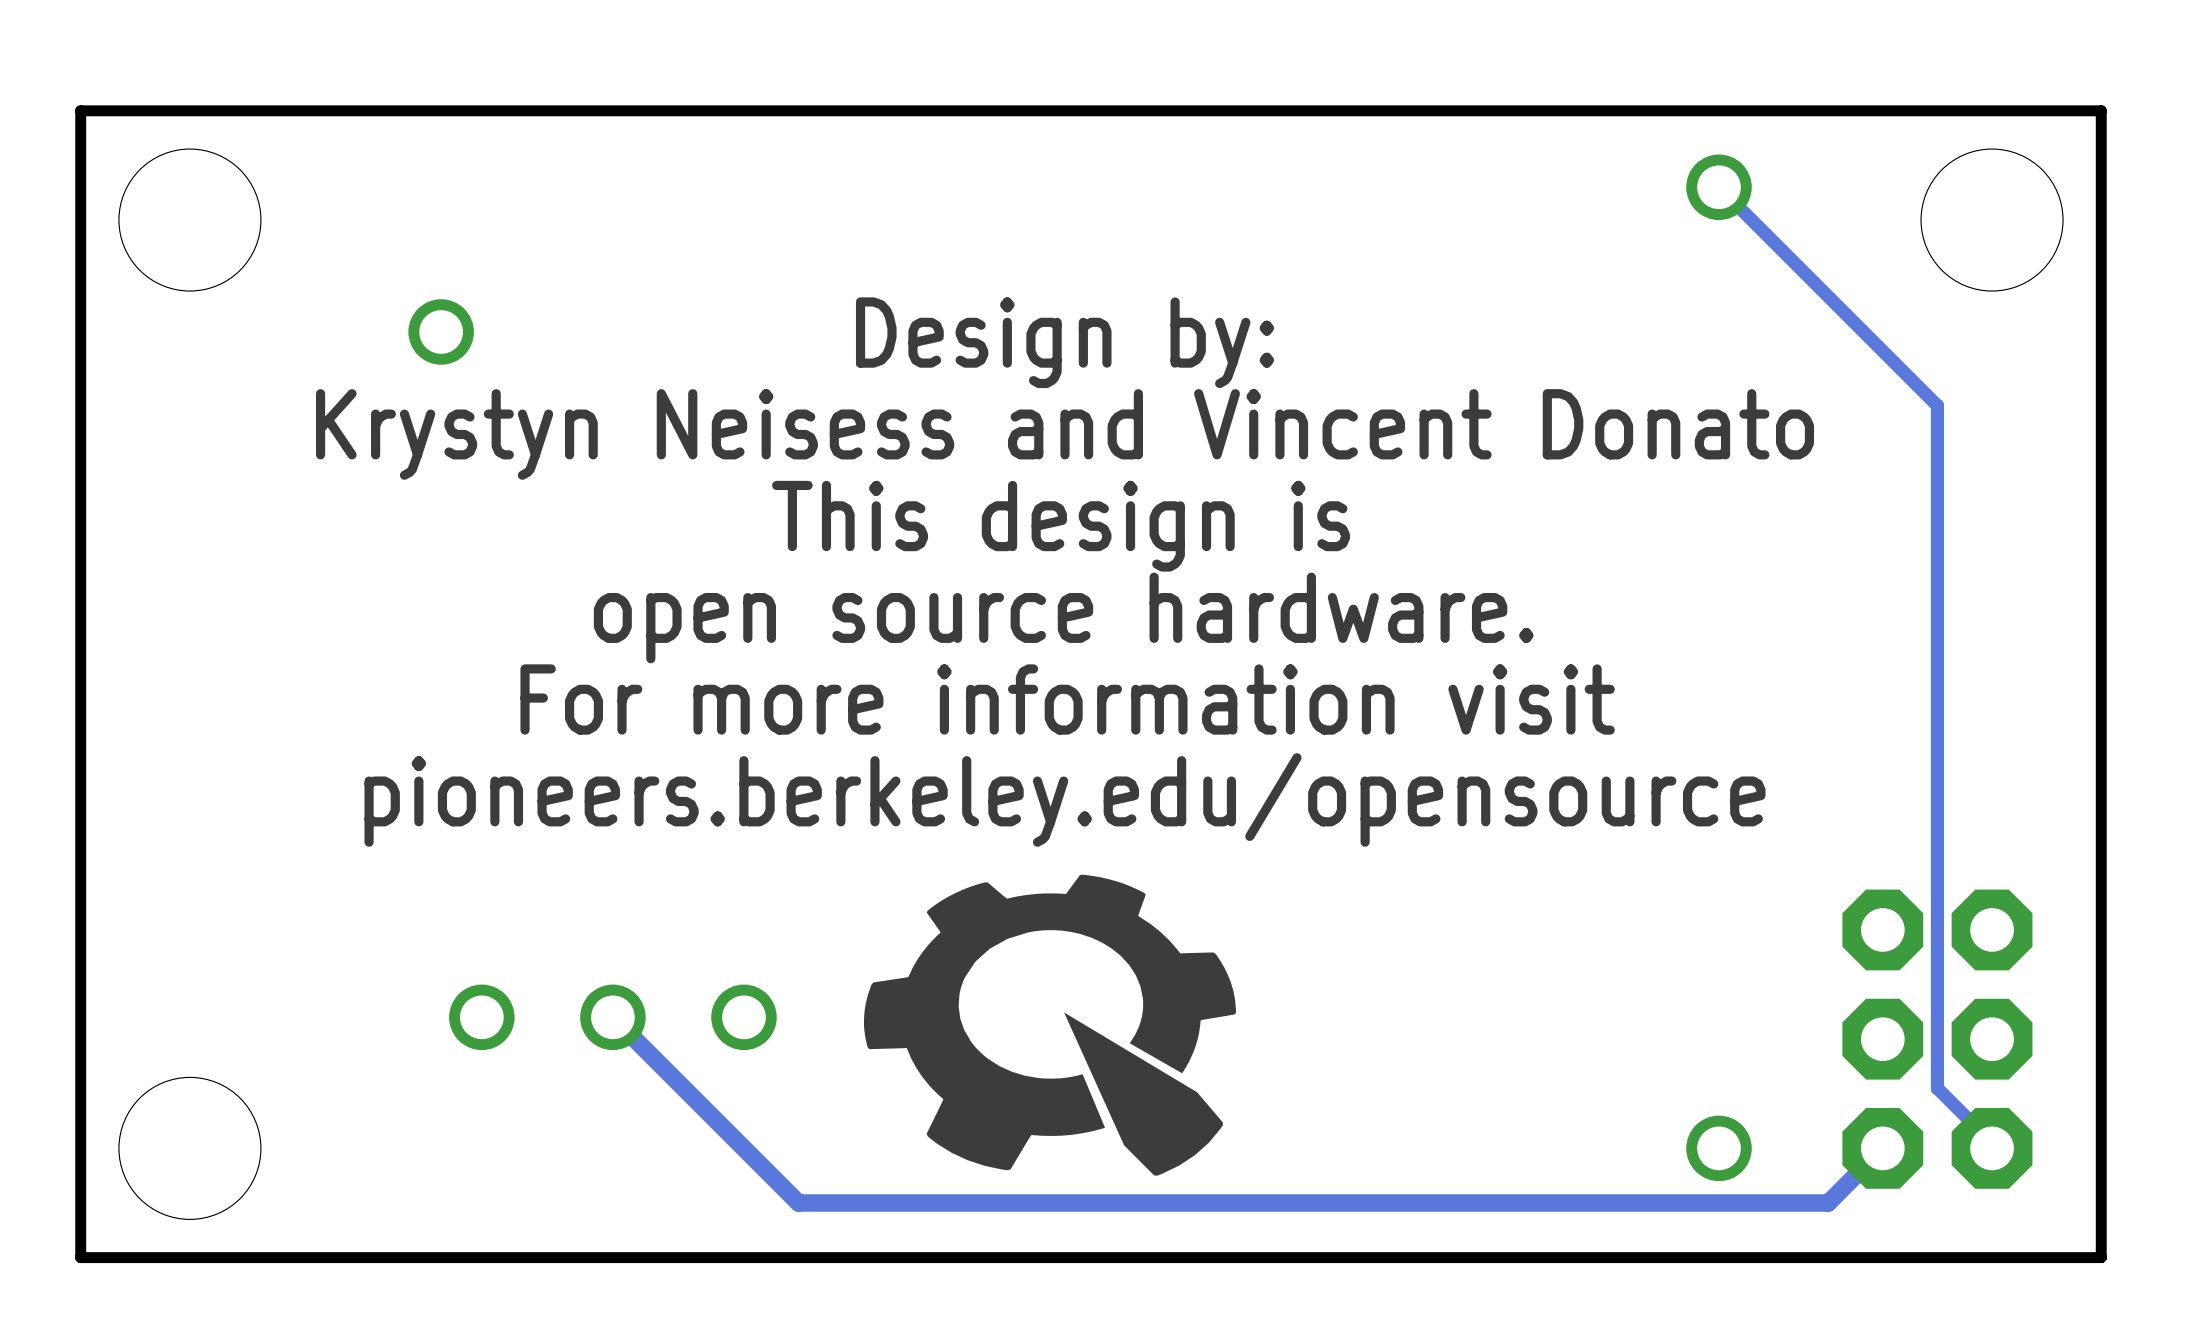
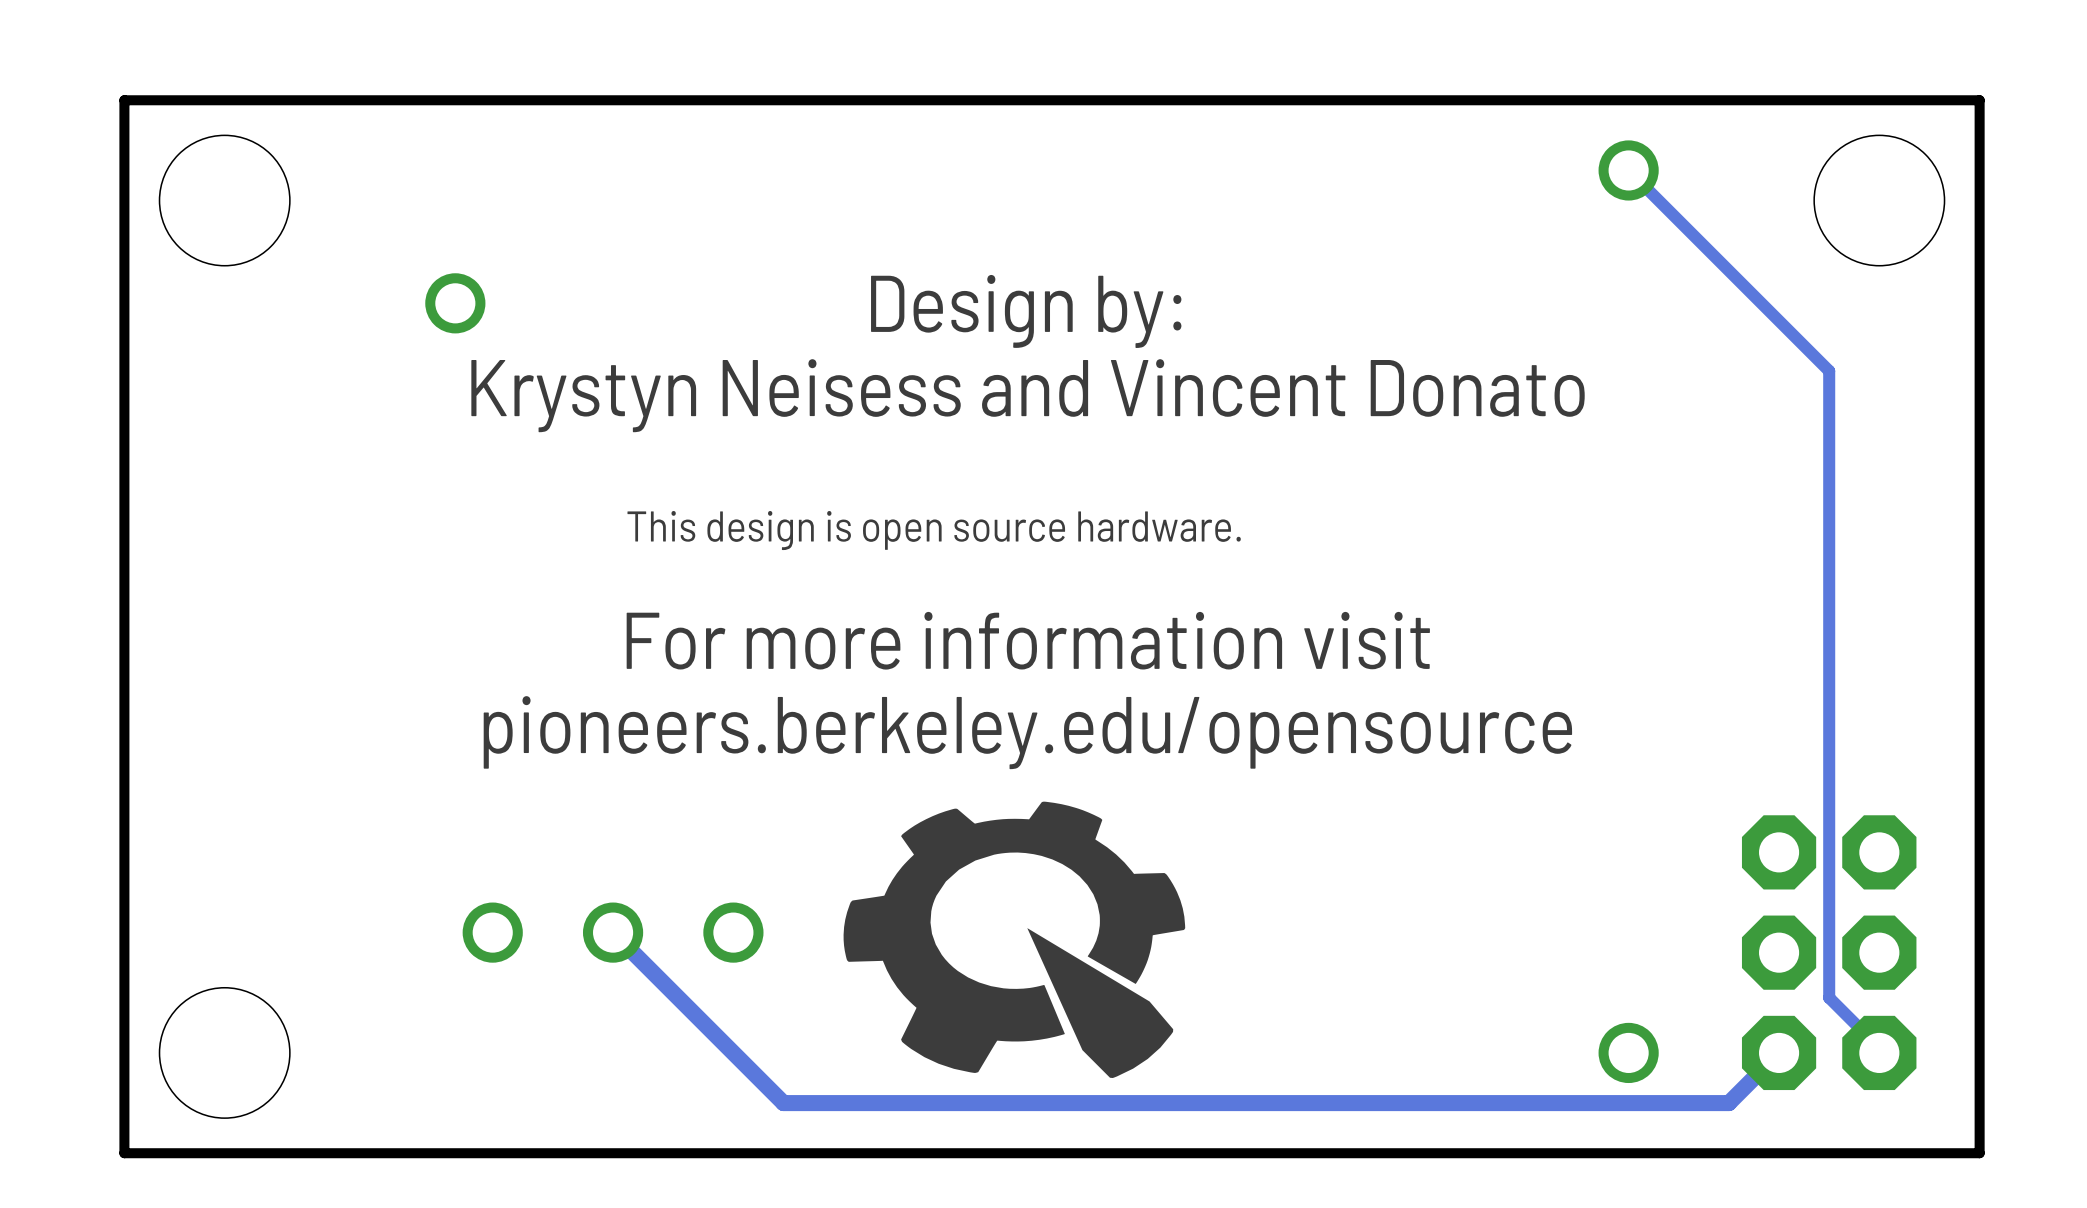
text: This design is (1061, 526) -> none
text: open source hardware. (1063, 617) -> This design is open source hardware. (934, 530)

